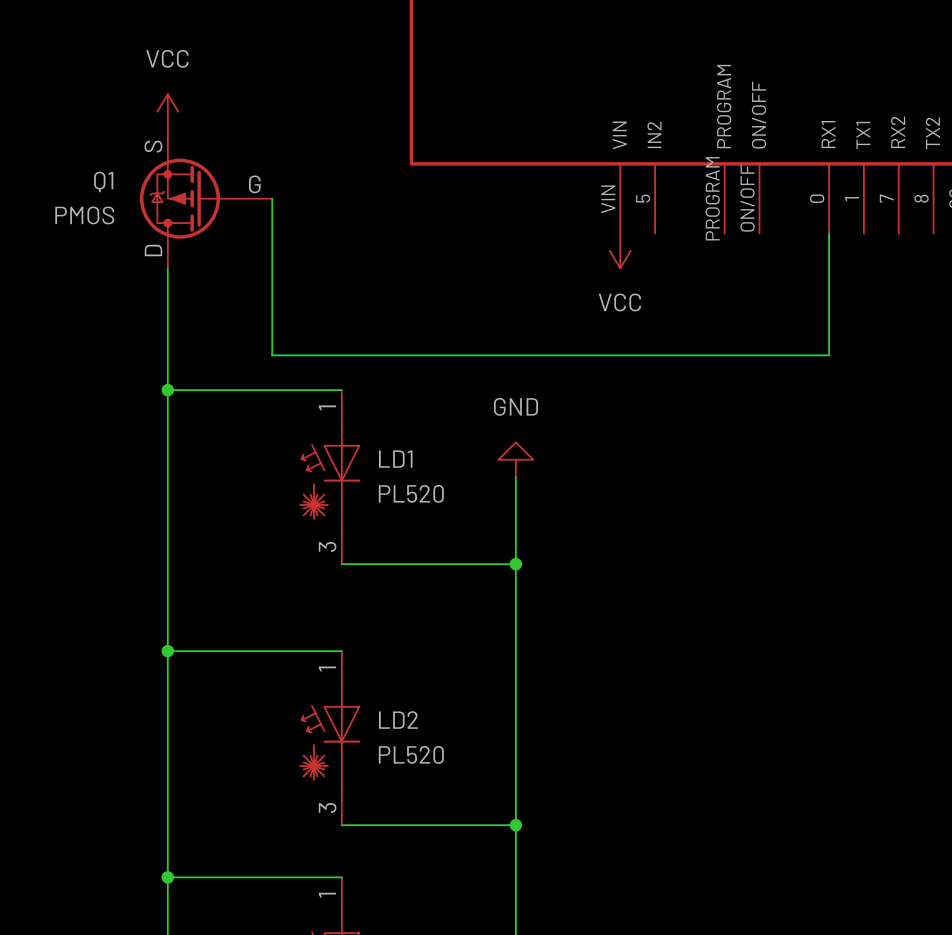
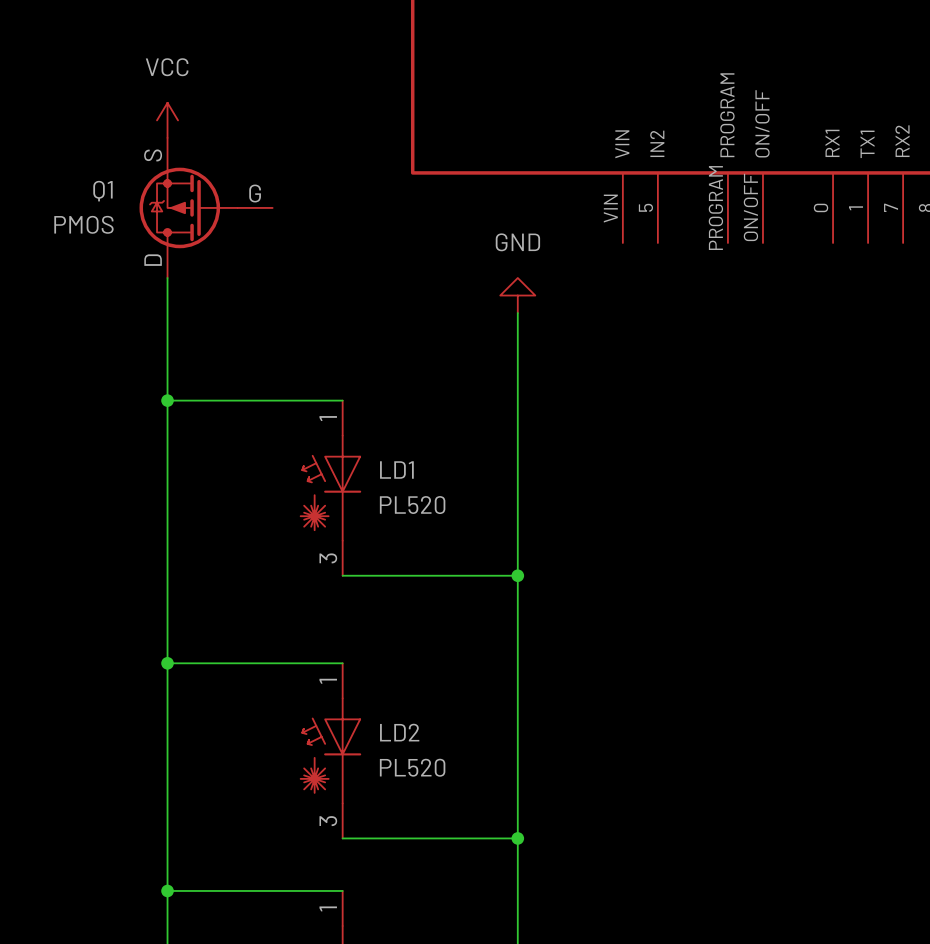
wire: (272, 198) (272, 355) (829, 355) (829, 233) -> none
power symbol: VCC (620, 250) -> none
wire: none -> (517, 313) (517, 488)
power symbol position: GND (515, 459) -> GND (517, 295)

